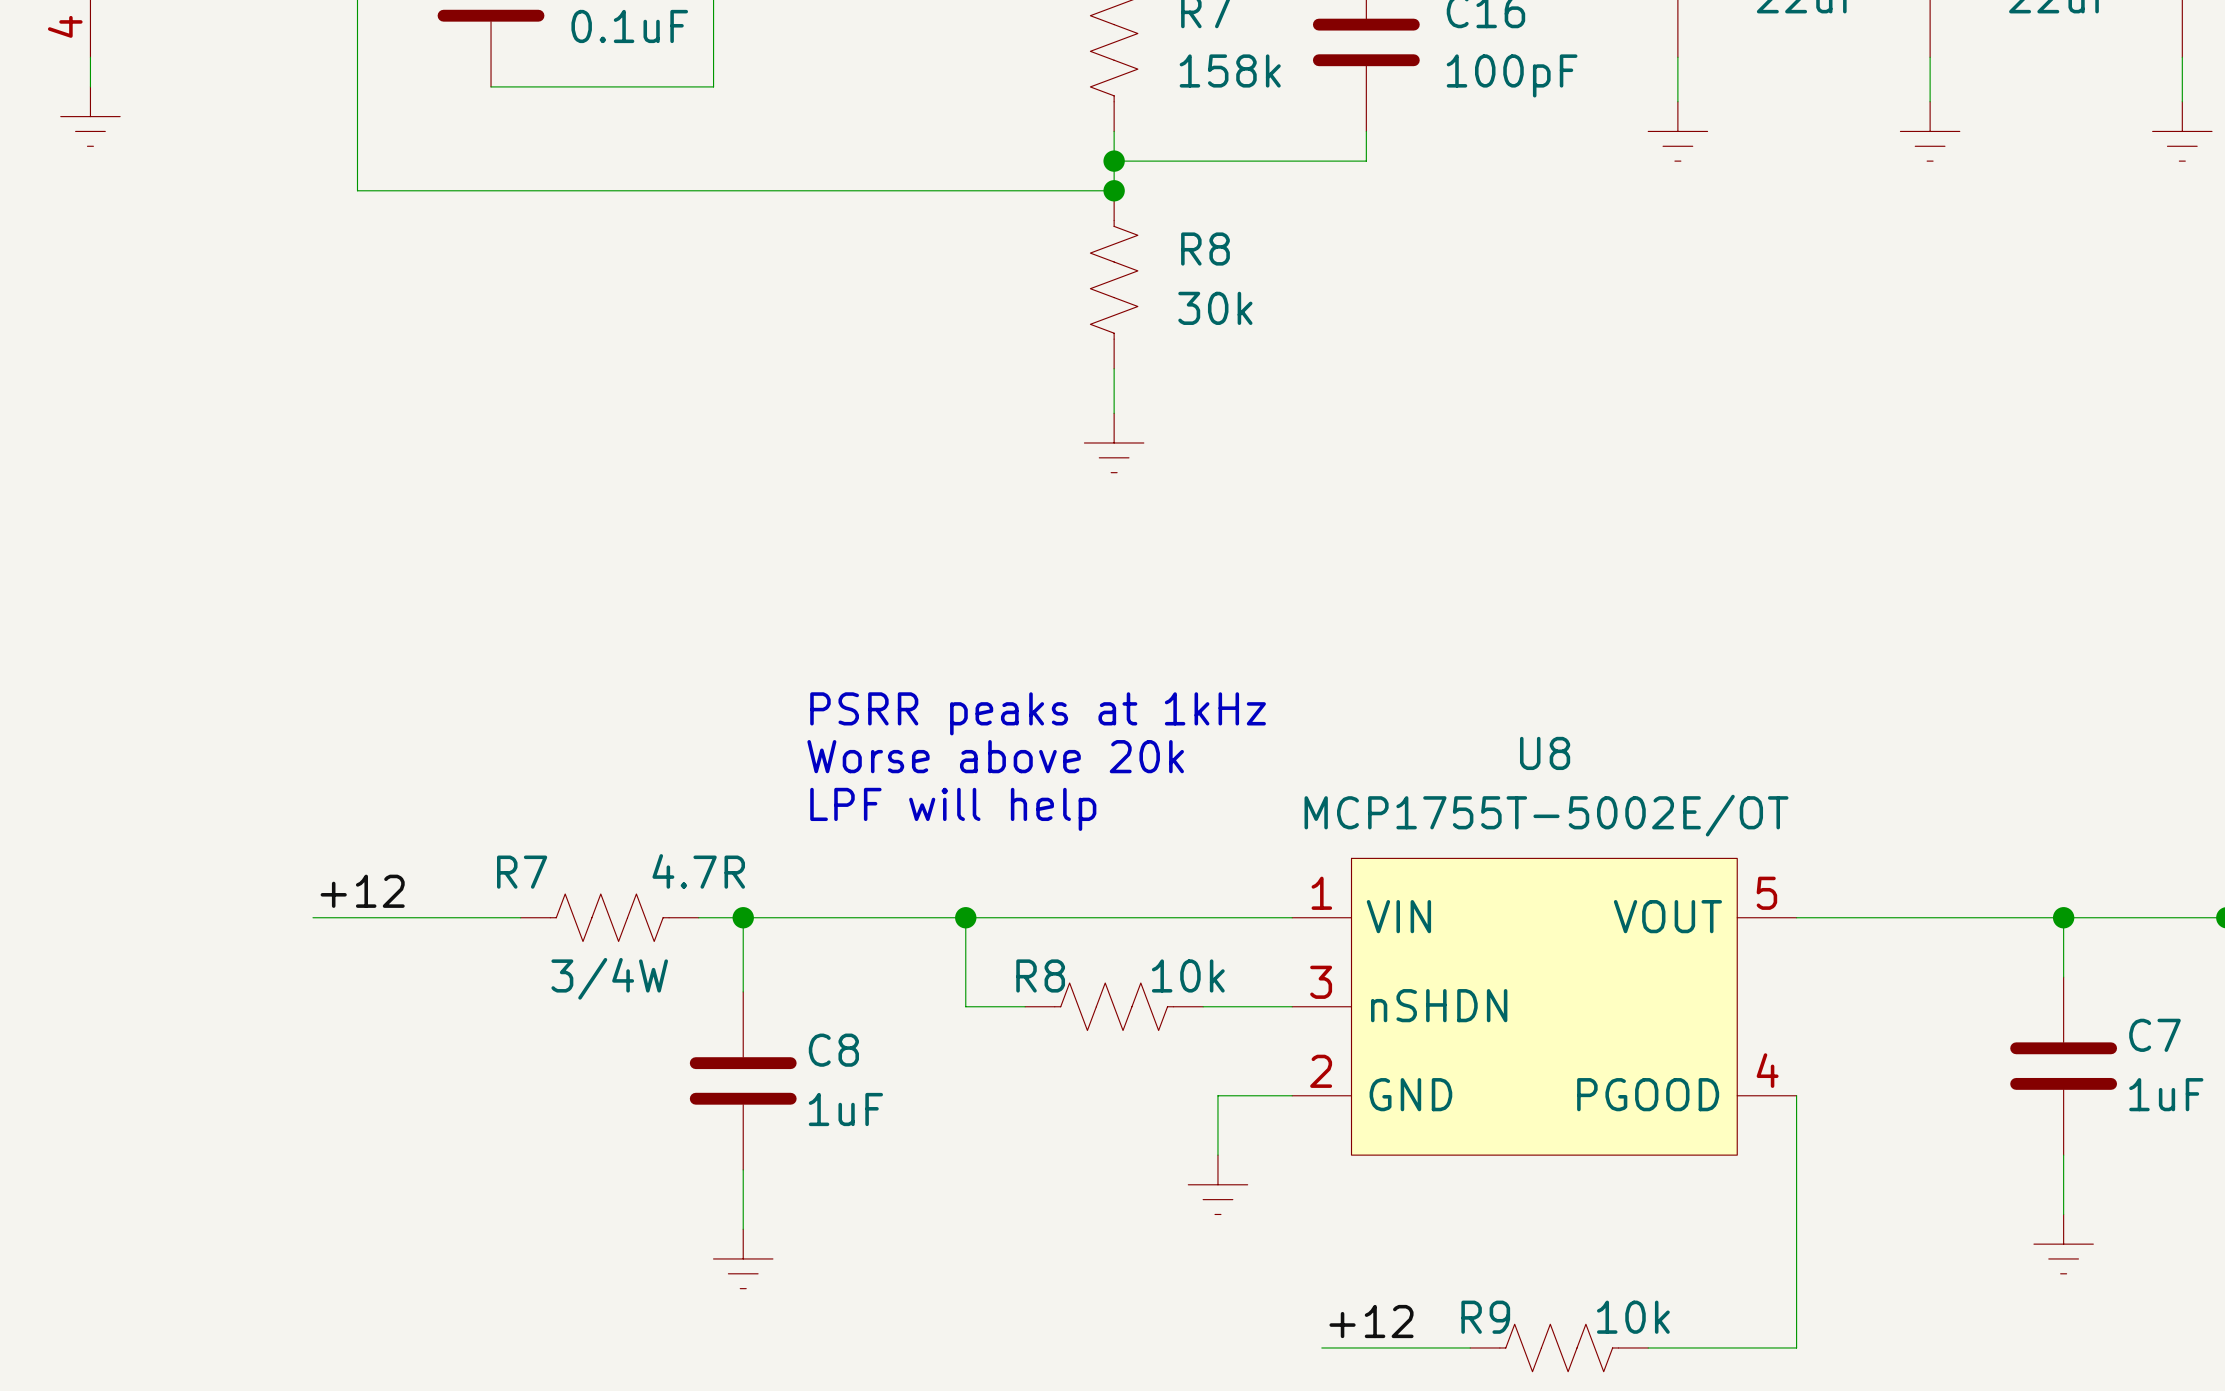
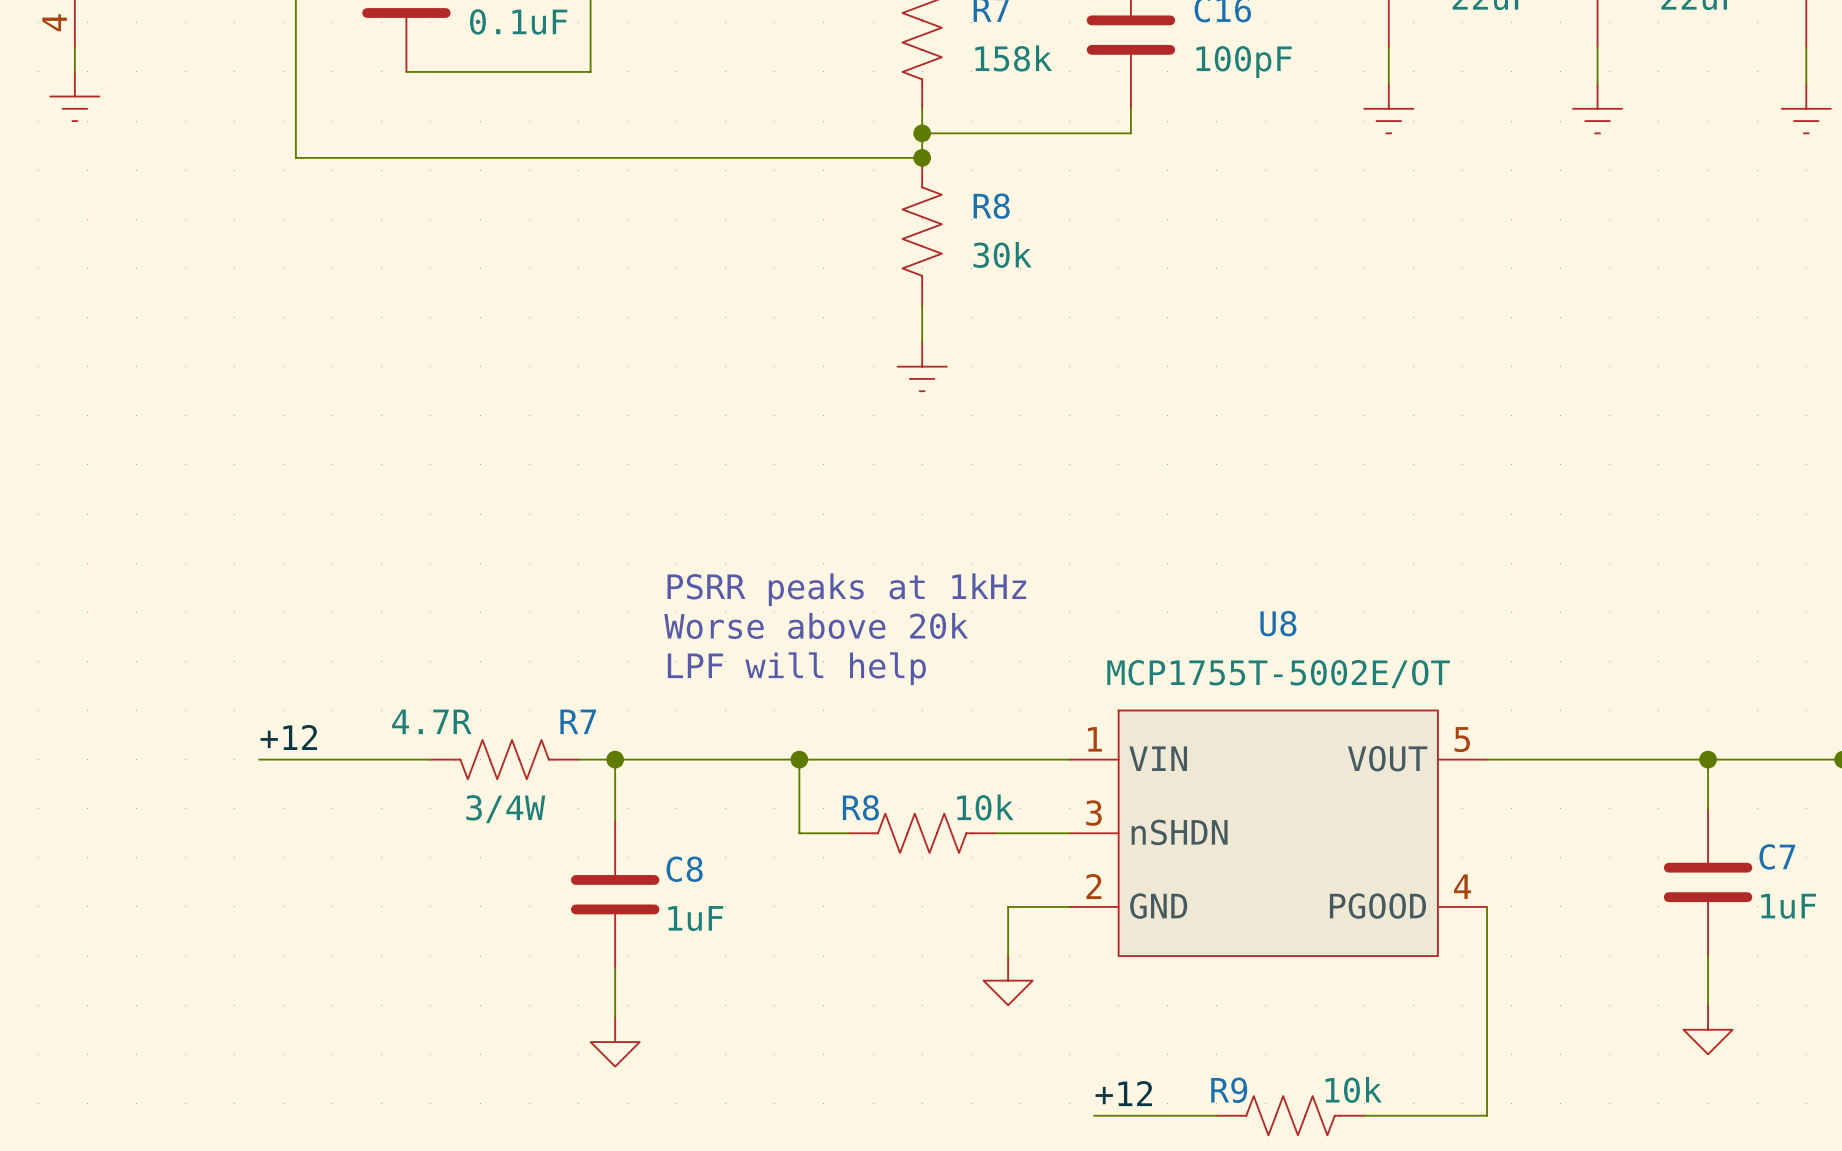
R7 flip: as is (609, 917) -> left-right (504, 759)
power symbol shape: [1188, 1155, 1248, 1215] -> [983, 956, 1033, 1006]
power symbol shape: [2033, 1214, 2094, 1274] -> [1683, 1005, 1733, 1055]
power symbol shape: [713, 1229, 773, 1289] -> [590, 1017, 640, 1067]

